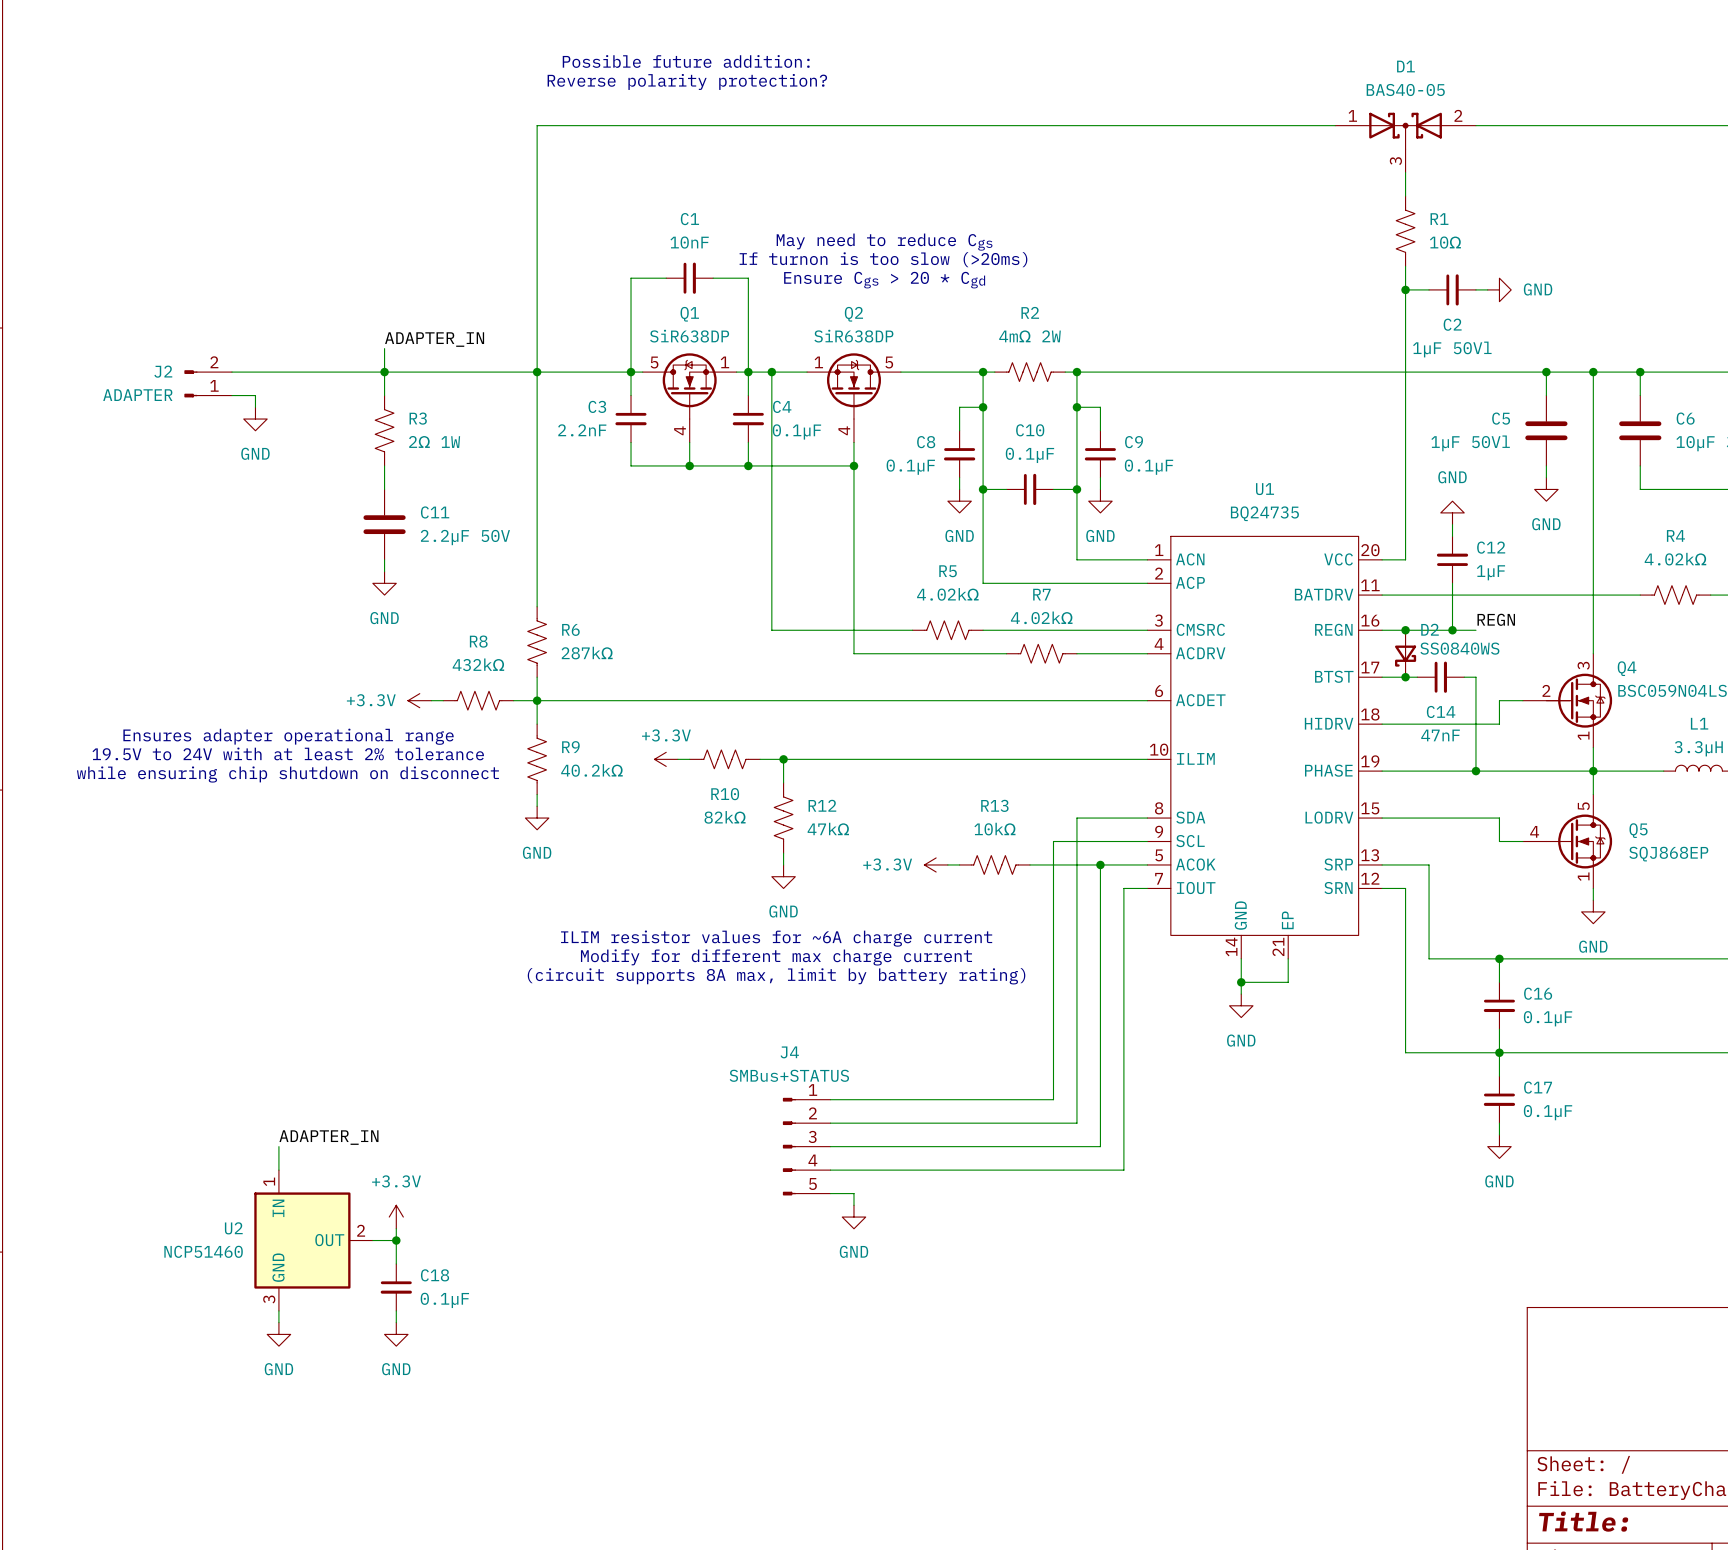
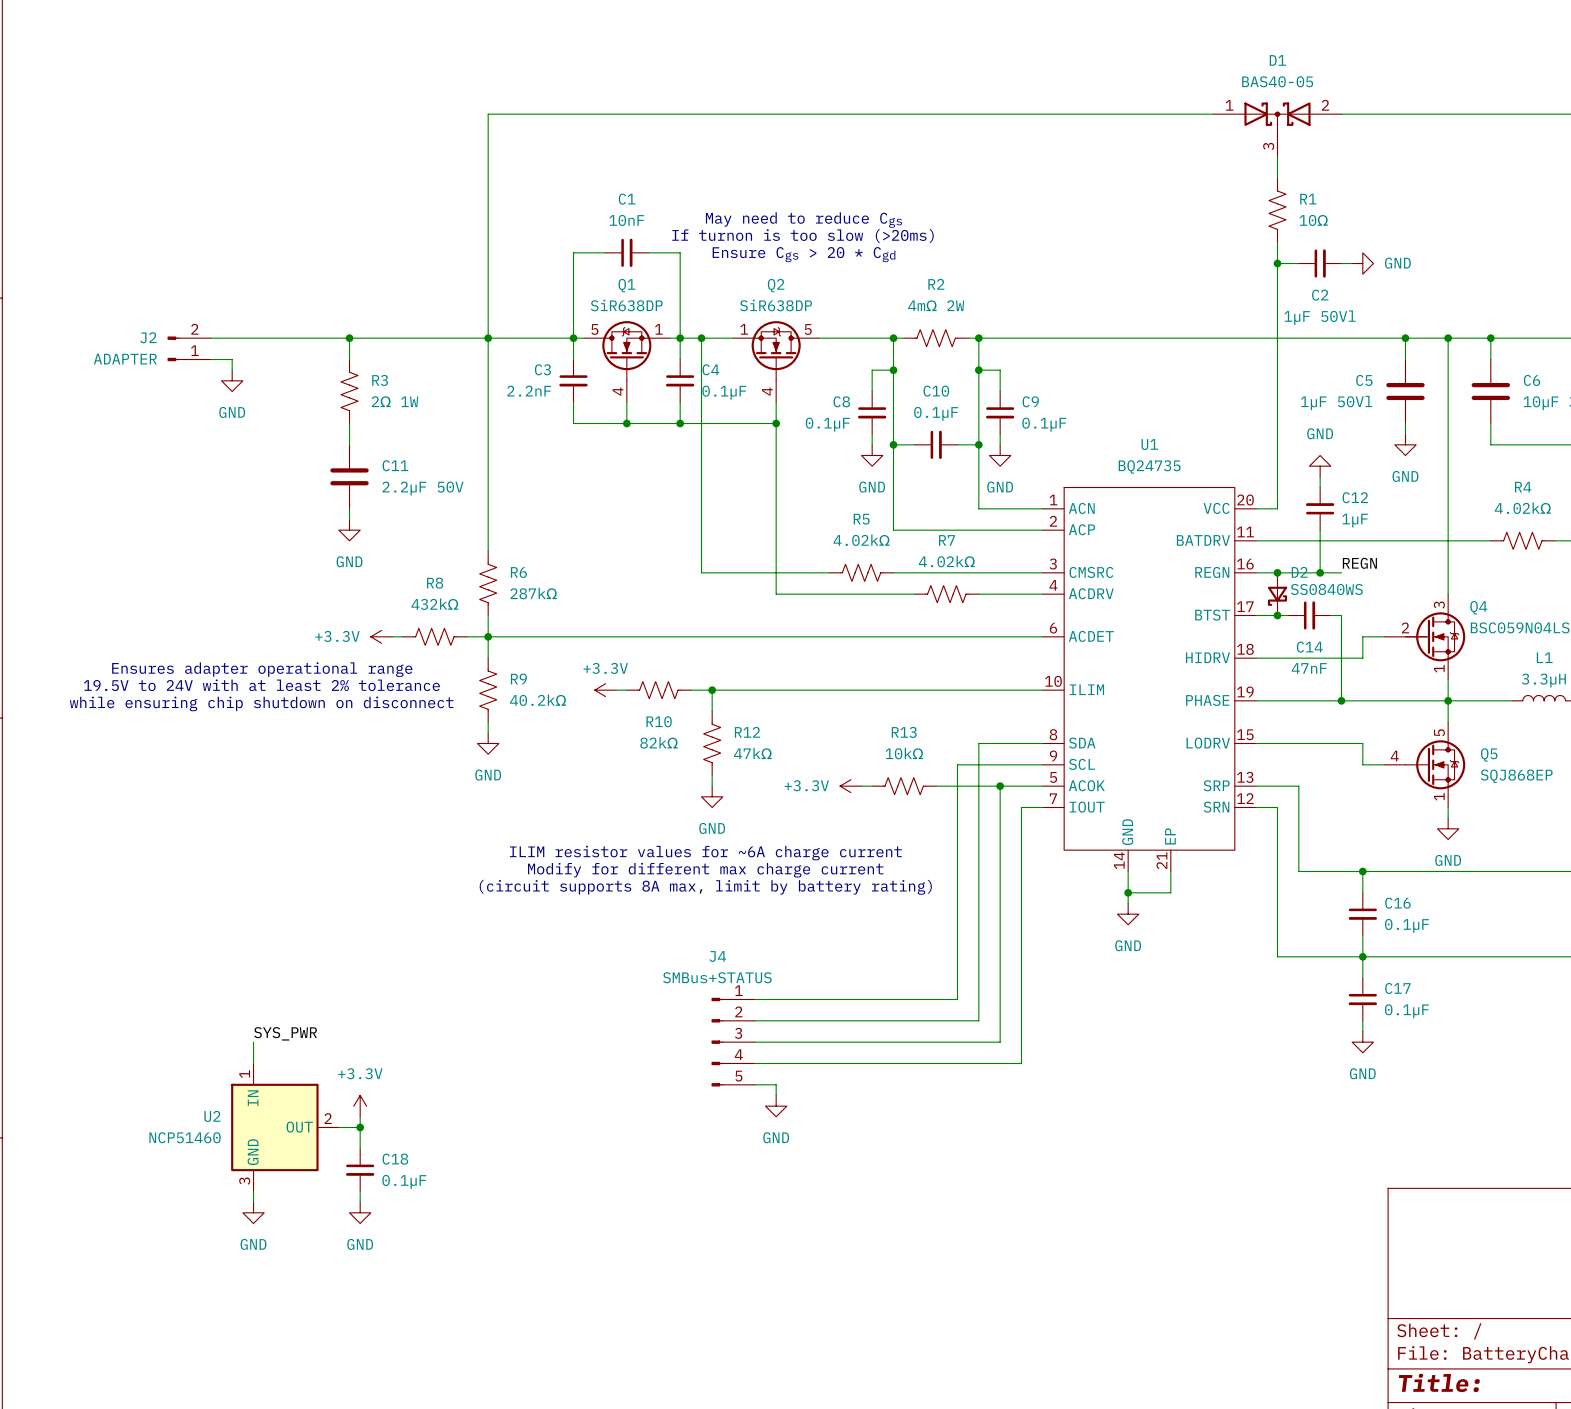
text: Possible future addition: (686, 61) -> none
text: Reverse polarity protection? (687, 81) -> none
label: ADAPTER_IN (434, 339) -> none
wire: (384, 348) (384, 372) -> none
label: ADAPTER_IN (328, 1137) -> SYS_PWR (285, 1033)

